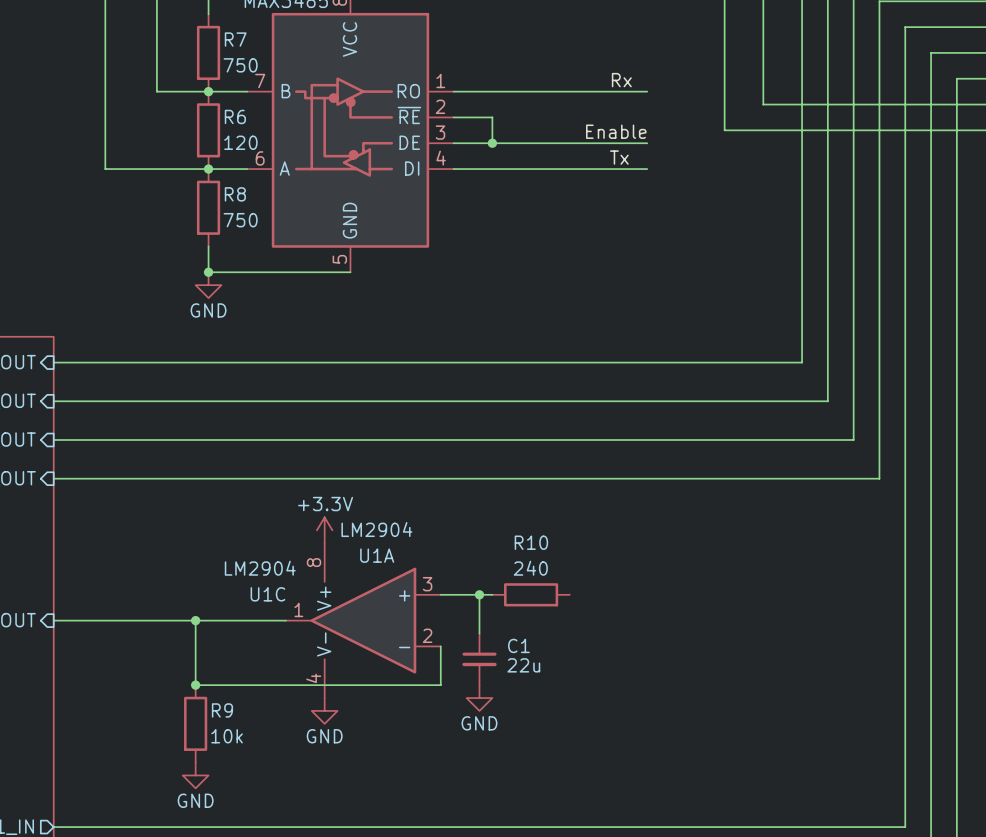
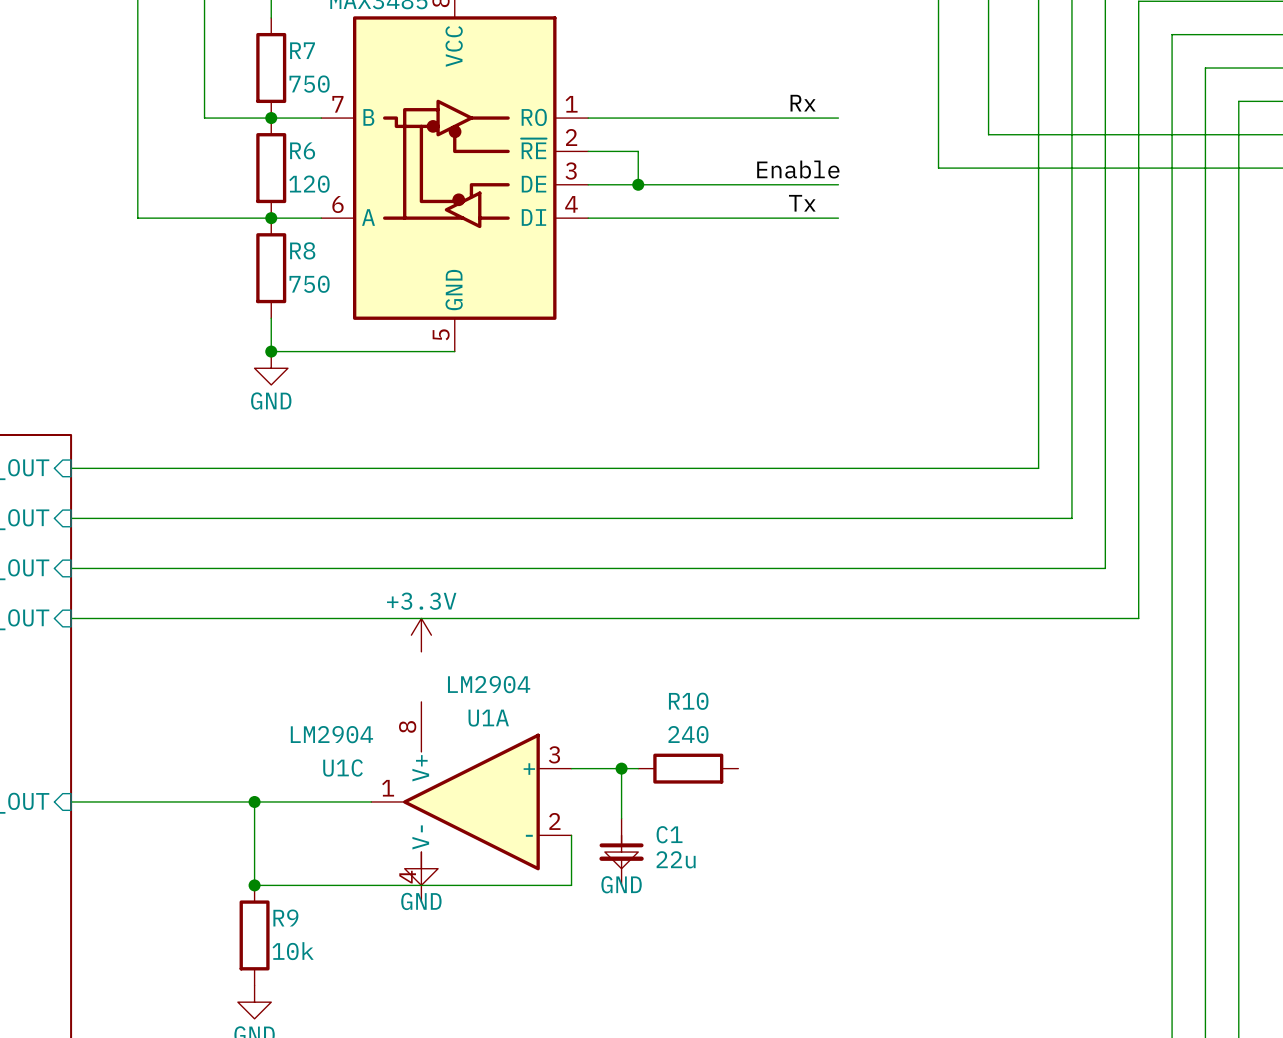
power symbol position: +3.3V (324, 530) -> +3.3V (421, 635)
power symbol position: GND (479, 698) -> GND (621, 852)
power symbol position: GND (324, 710) -> GND (421, 868)

